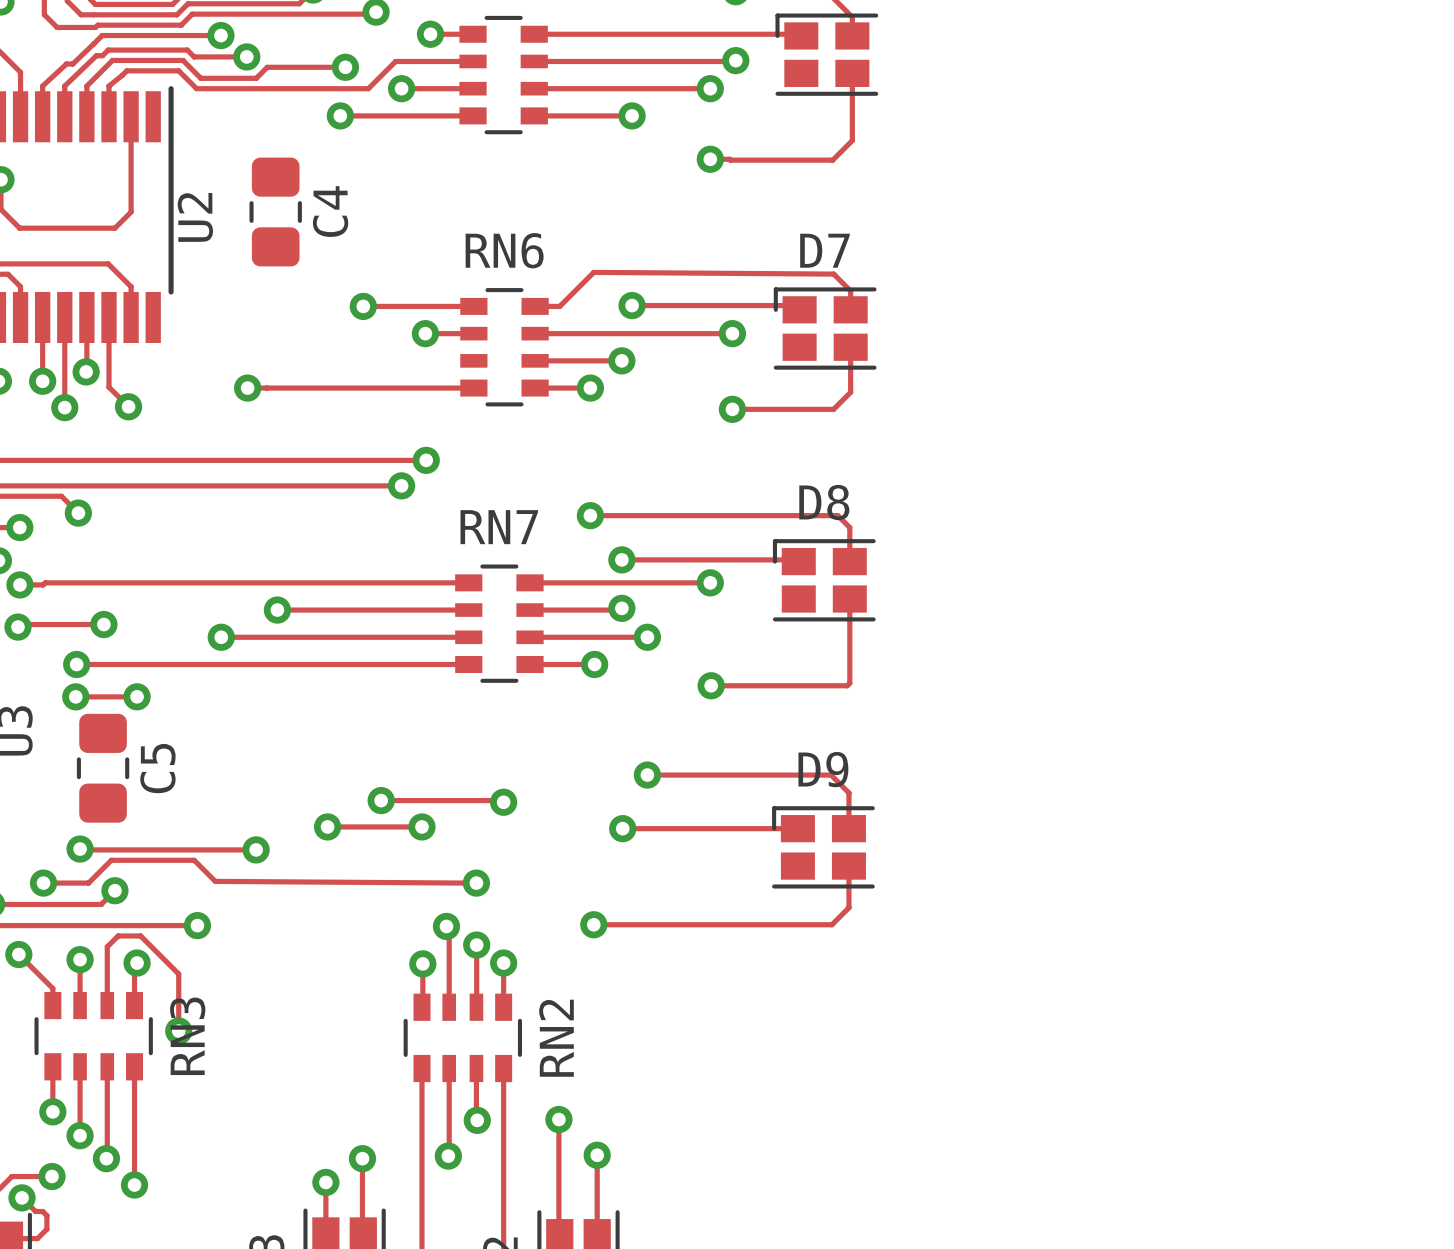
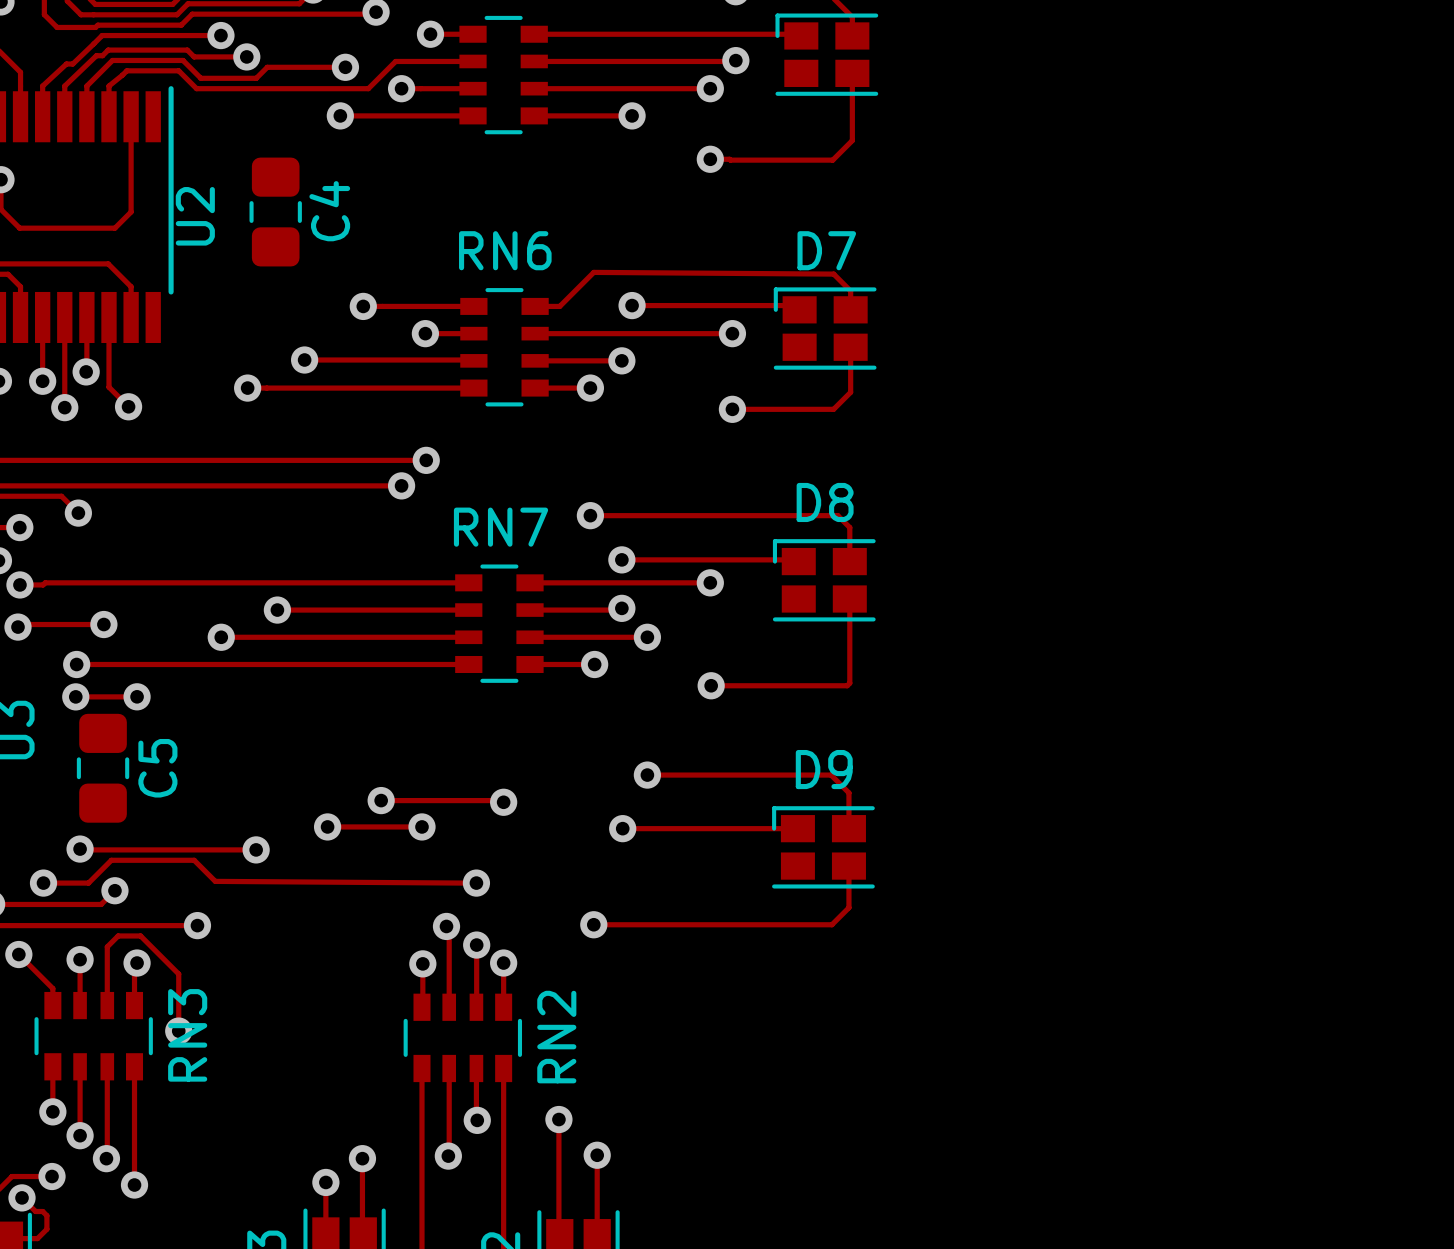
track: none -> (304, 360) (473, 360)
via: none -> (304, 360)

